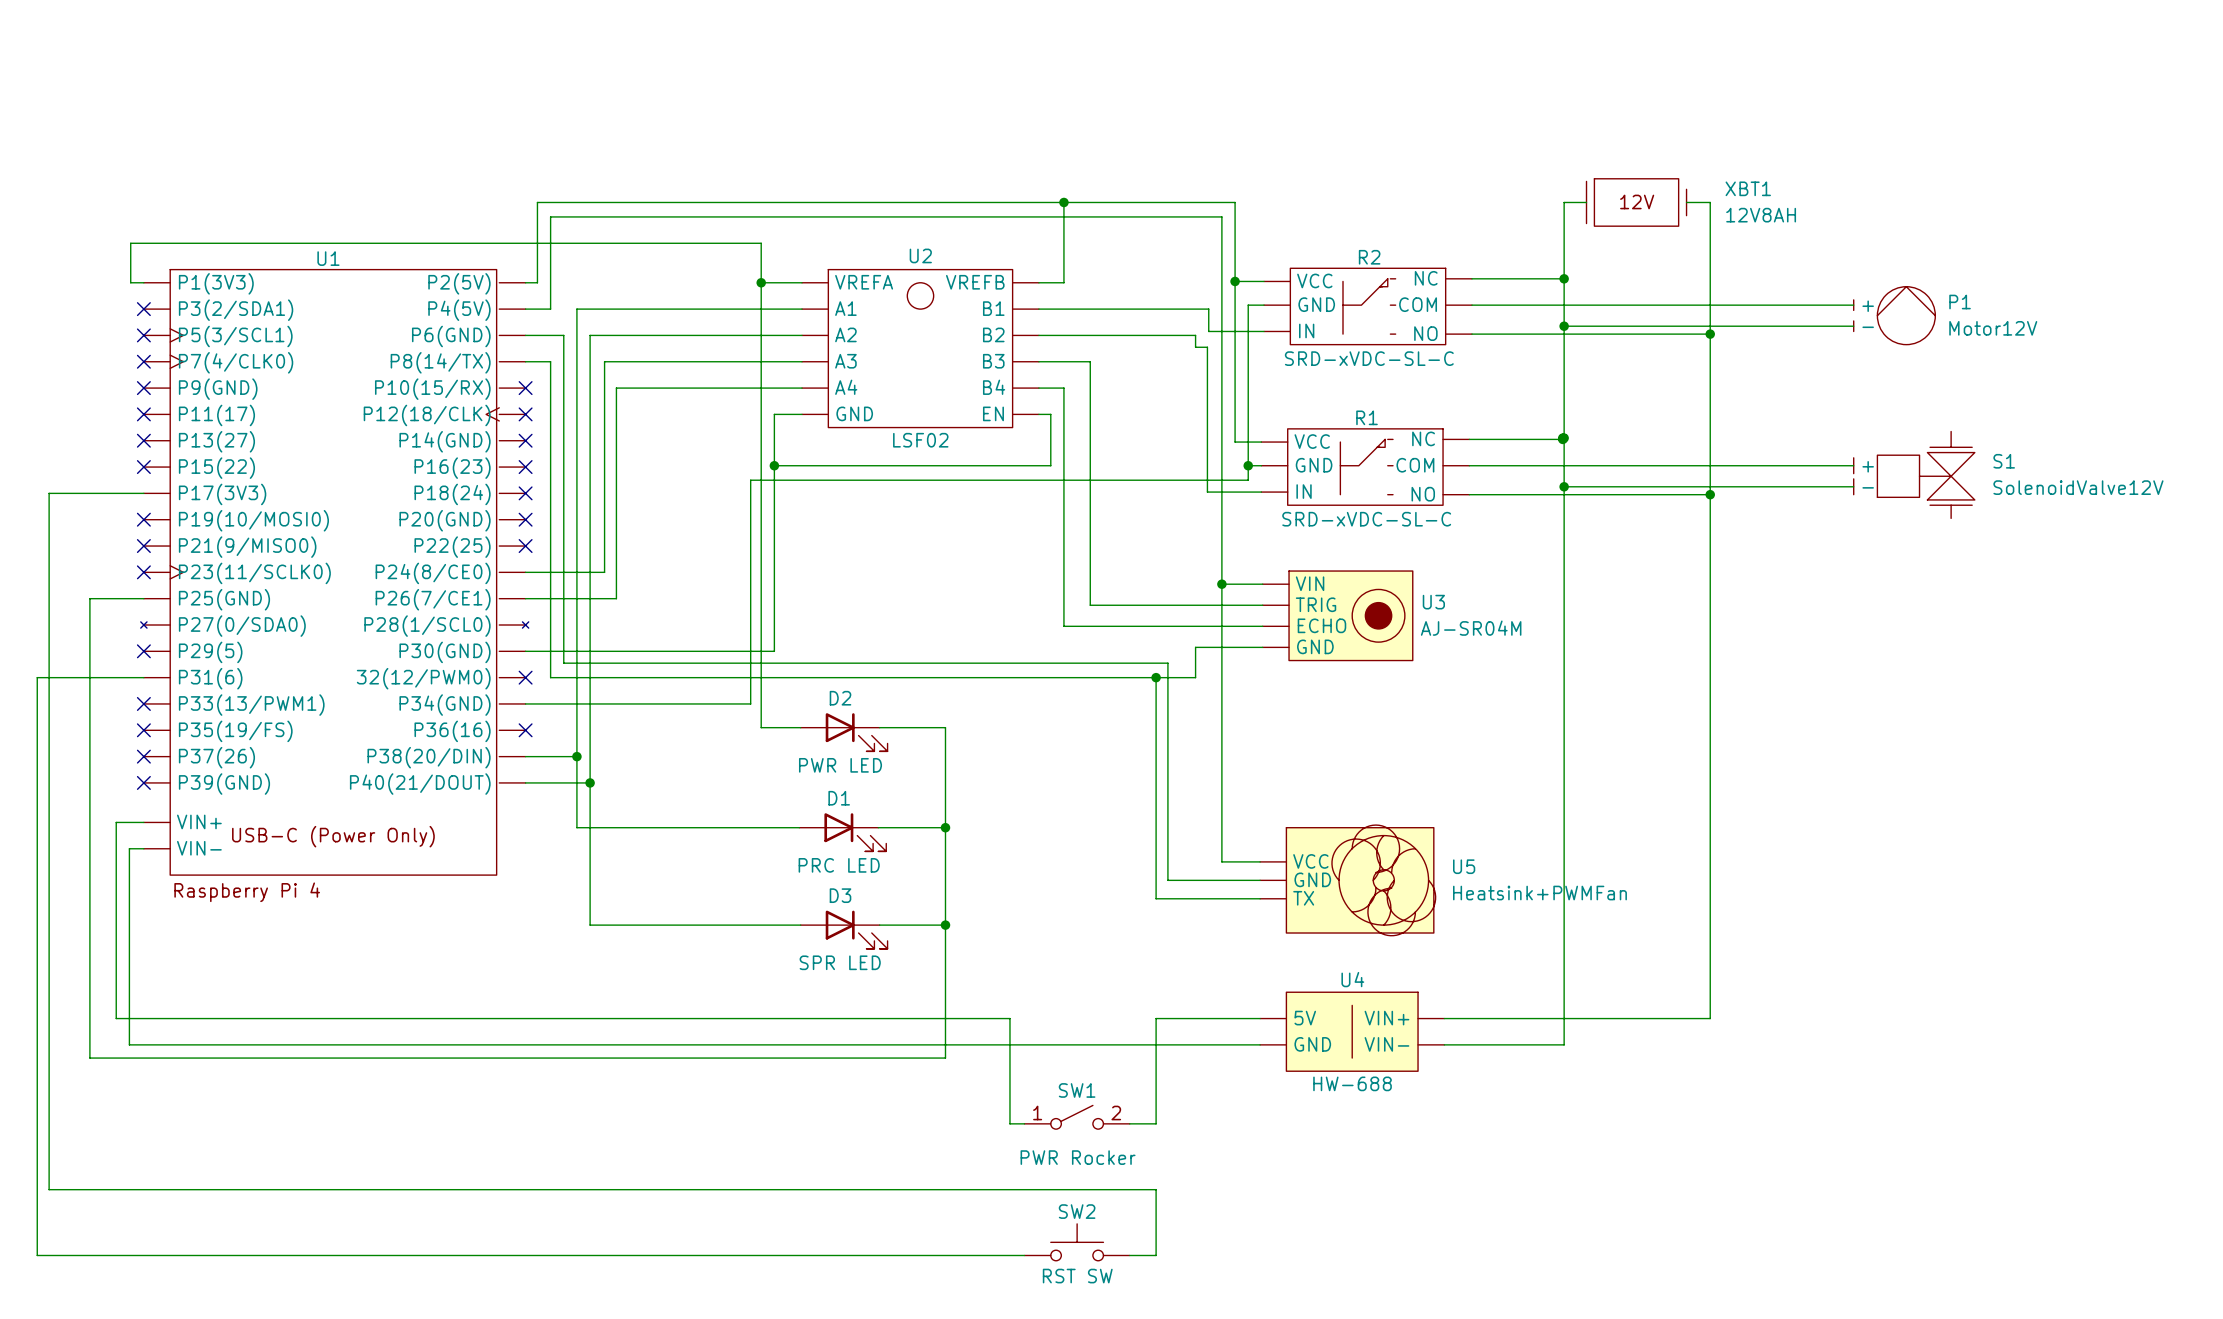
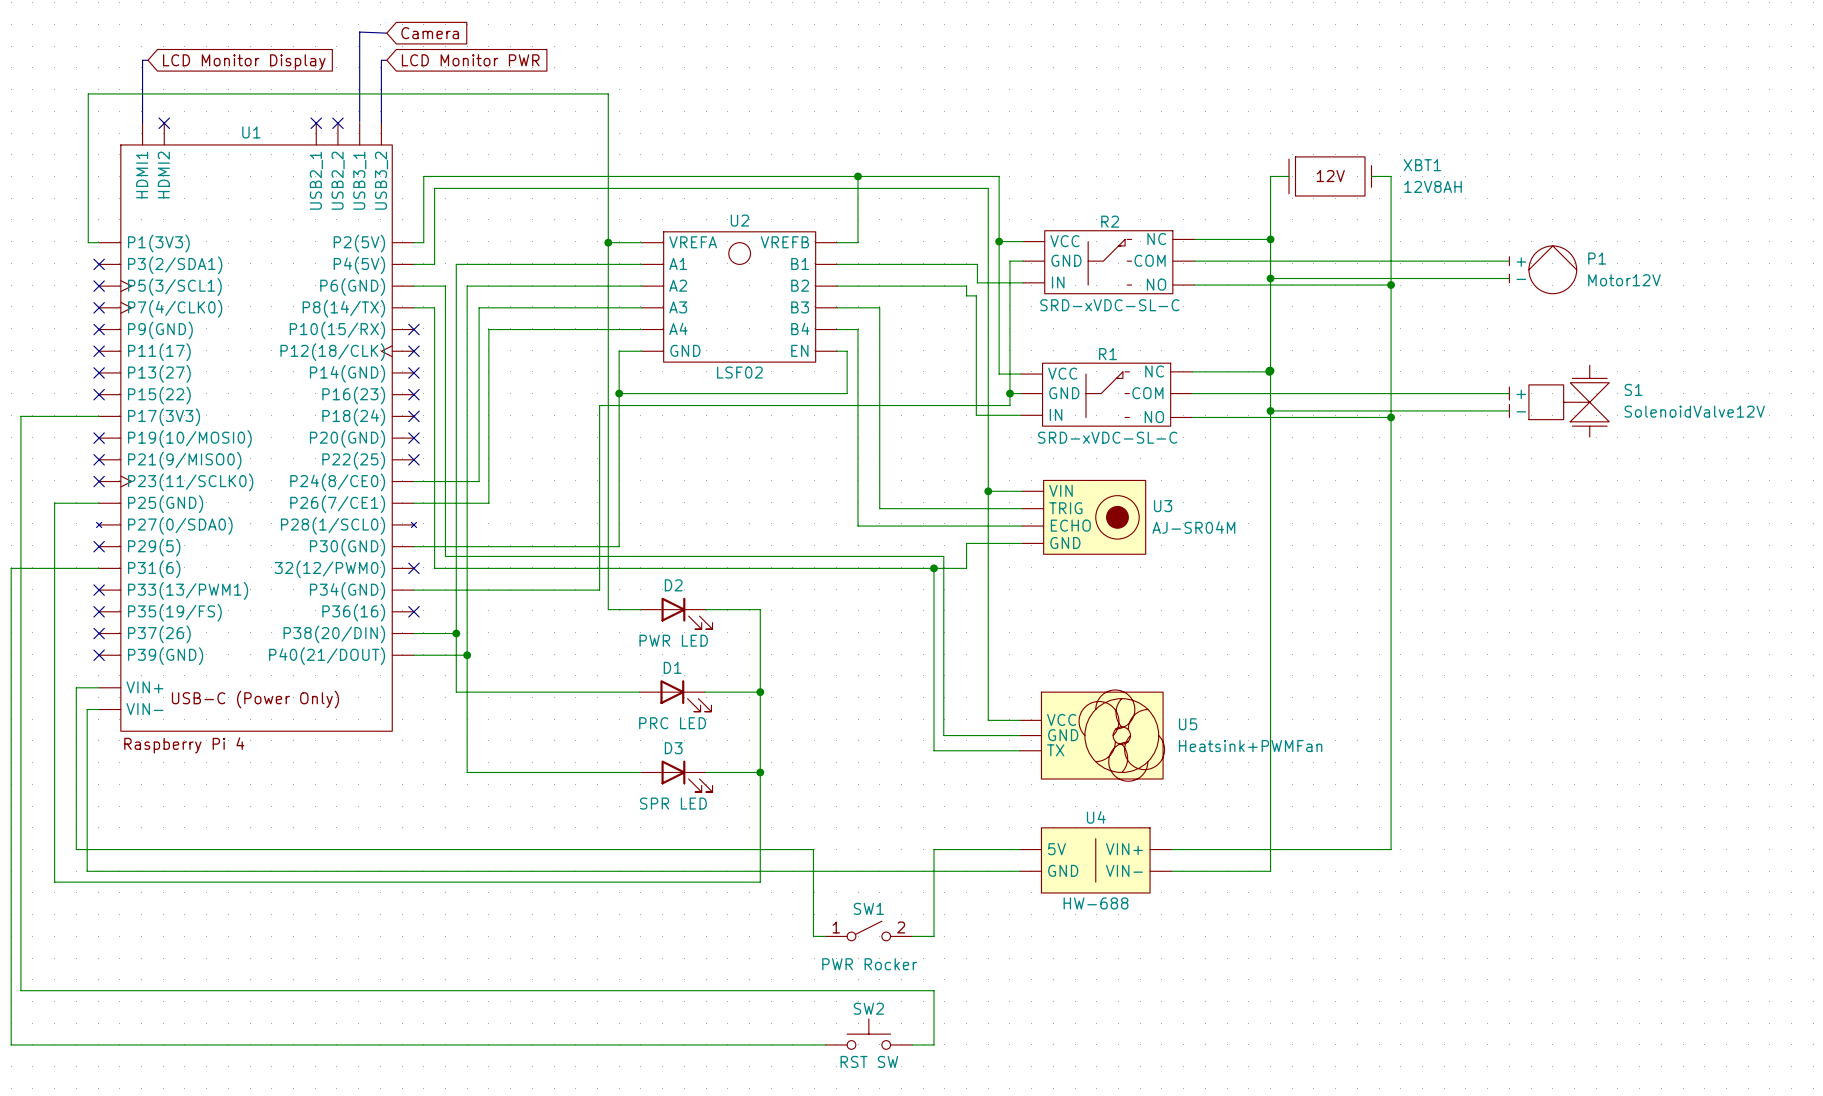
bus: none -> (386, 33) (359, 32) (359, 122)
global label: none -> Camera (430, 33)
bus: none -> (147, 60) (142, 60) (142, 123)
bus: none -> (386, 60) (381, 60) (381, 123)
global label: none -> LCD Monitor PWR (470, 60)
global label: none -> LCD Monitor Display (244, 62)
no-connect mark: none -> (164, 123)
no-connect mark: none -> (316, 123)
no-connect mark: none -> (337, 123)
wire: (130, 243) (761, 243) -> (88, 210) (88, 93) (608, 93) (608, 210)
U1 name position: U1 (328, 258) -> U1 (251, 132)
U1 symbol: [140, 269, 529, 876] -> [96, 123, 417, 732]

